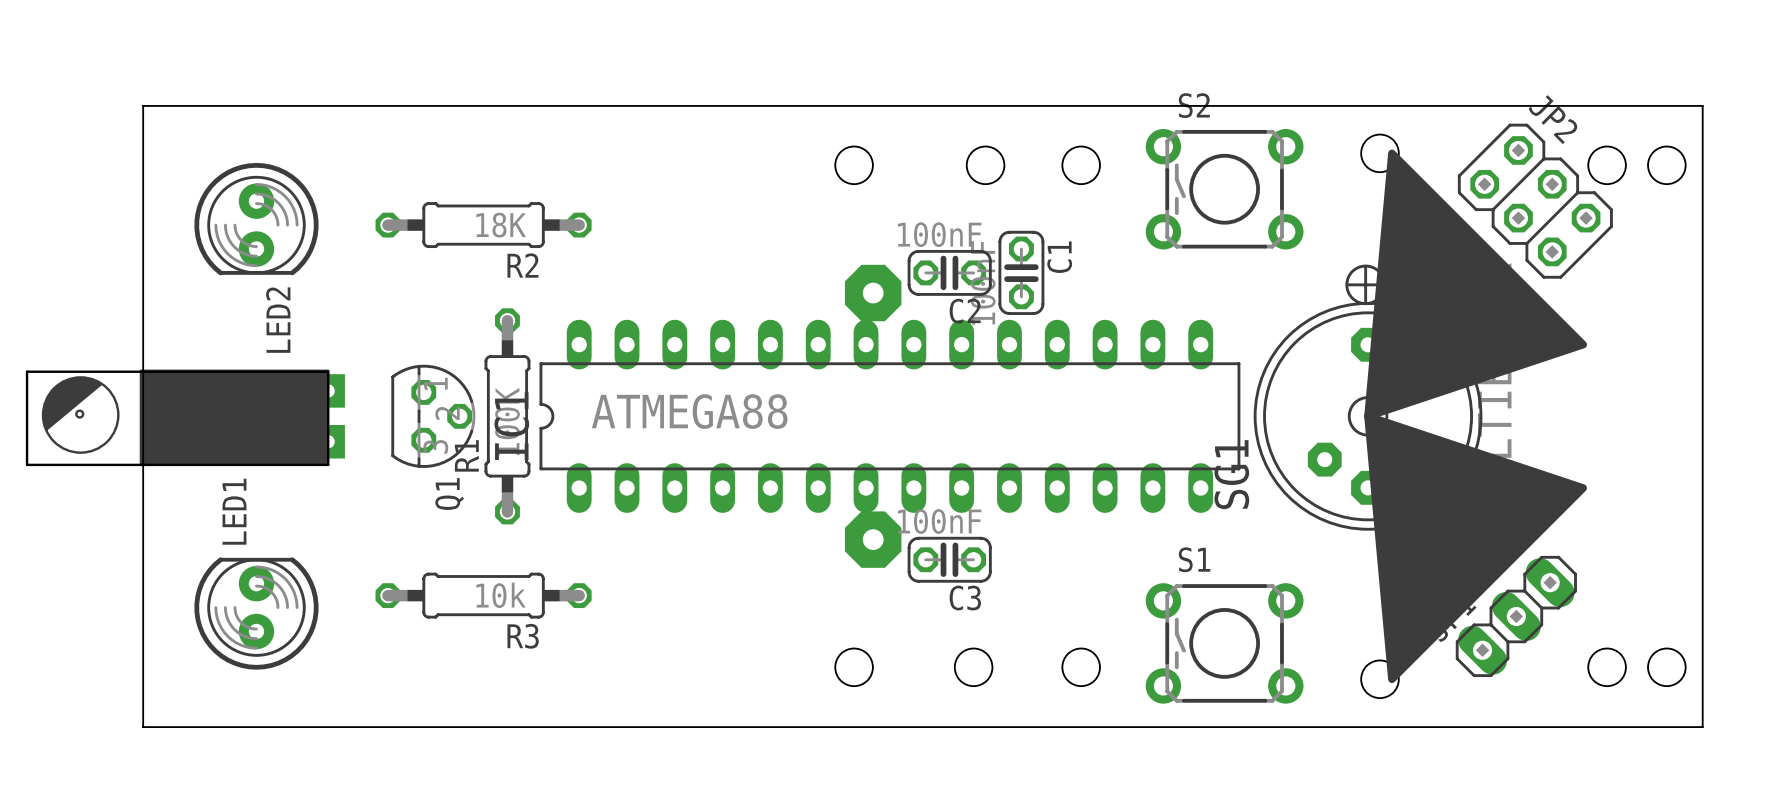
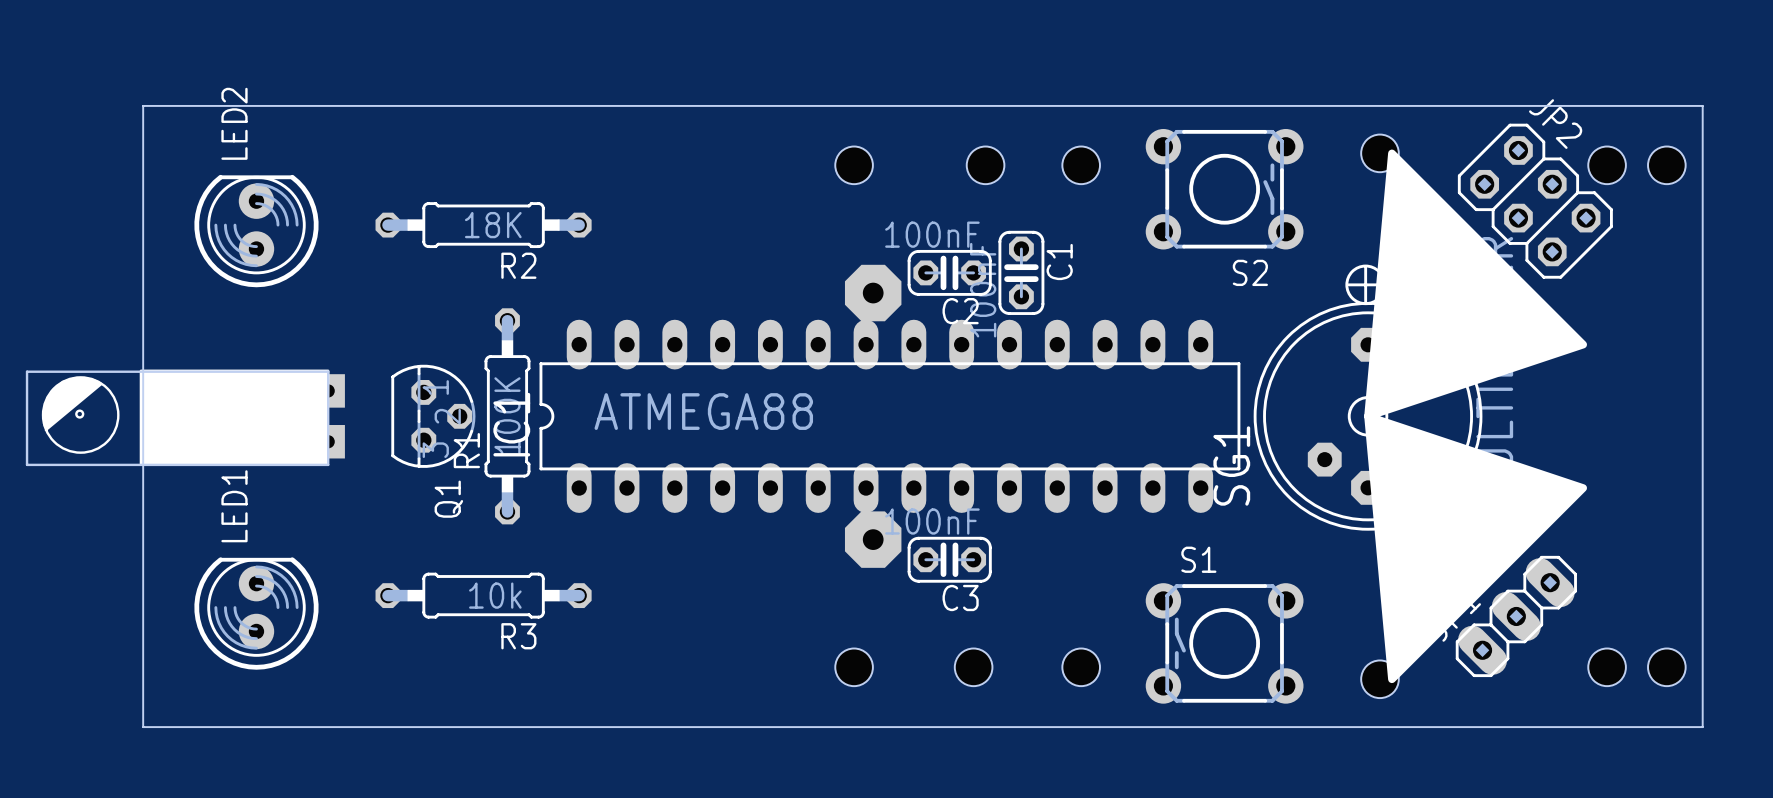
S2 rotation: 0° (1224, 189) -> 180° (1224, 189)
LED2 rotation: 0° (256, 219) -> 180° (256, 231)

